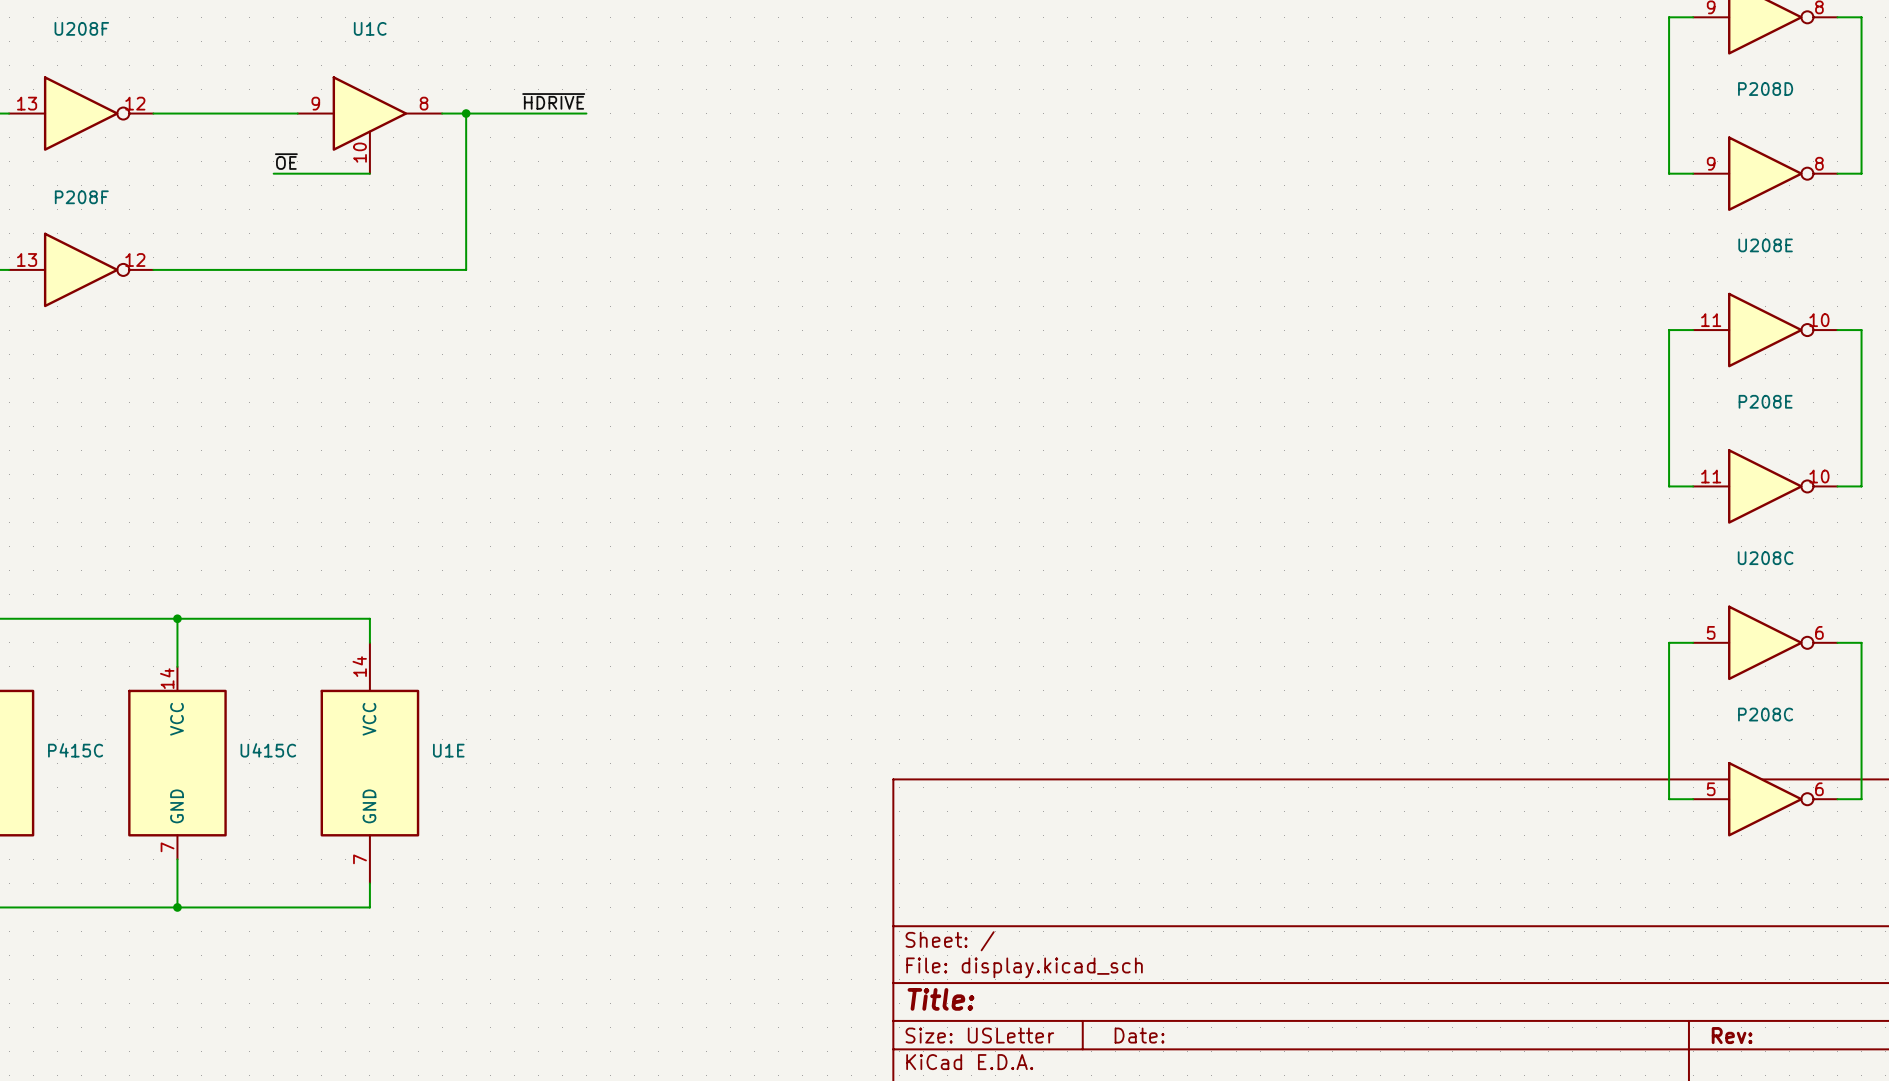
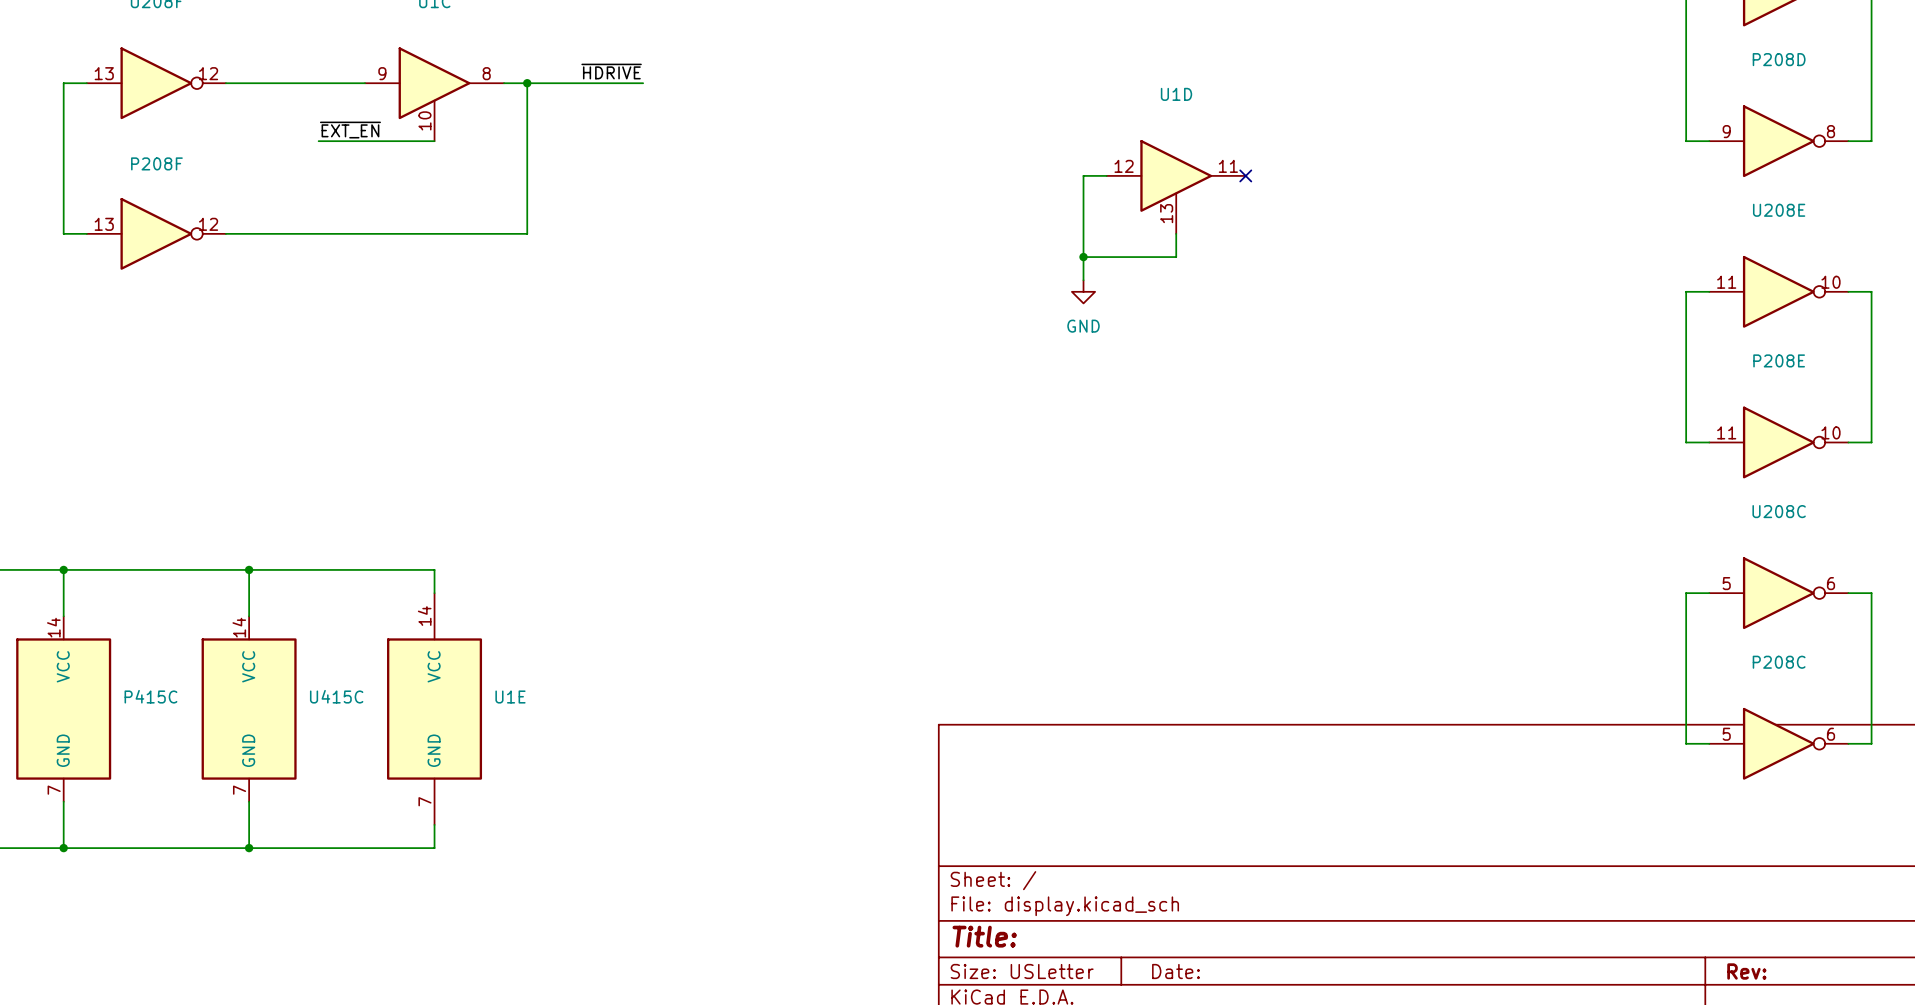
label: ~{OE} (286, 161) -> none
label: none -> ~{EXT_EN} (350, 130)
wire: none -> (318, 141) (341, 141)
wire: none -> (1106, 175) (1083, 175) (1083, 280)
no-connect mark: none -> (1245, 175)
U1D: none -> (1176, 186)
wire: none -> (1176, 233) (1176, 257) (1083, 257)
junction: none -> (1083, 257)
power symbol: none -> GND (1083, 291)

